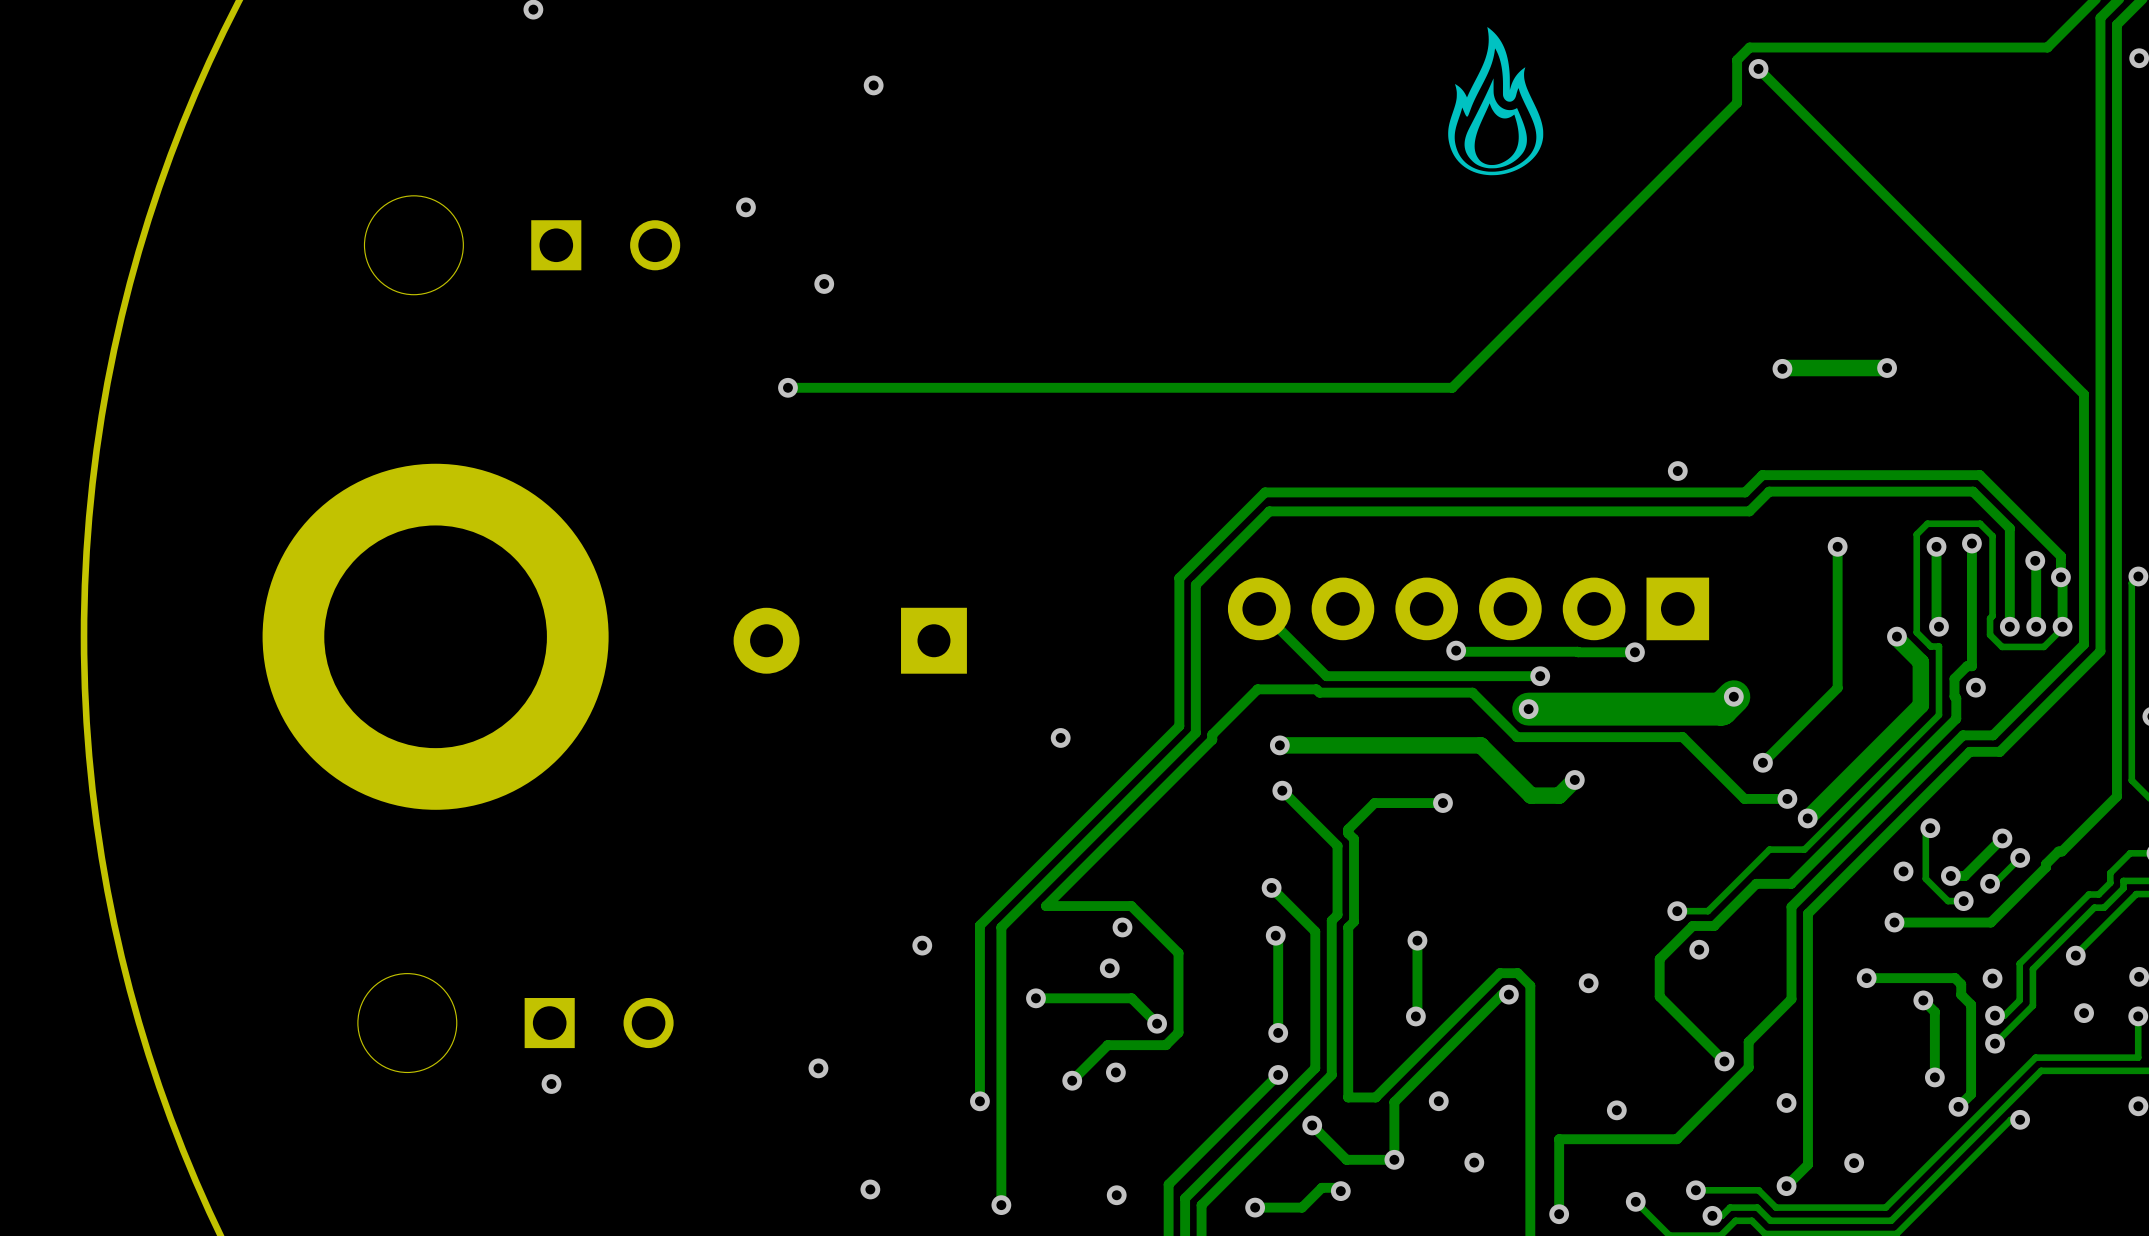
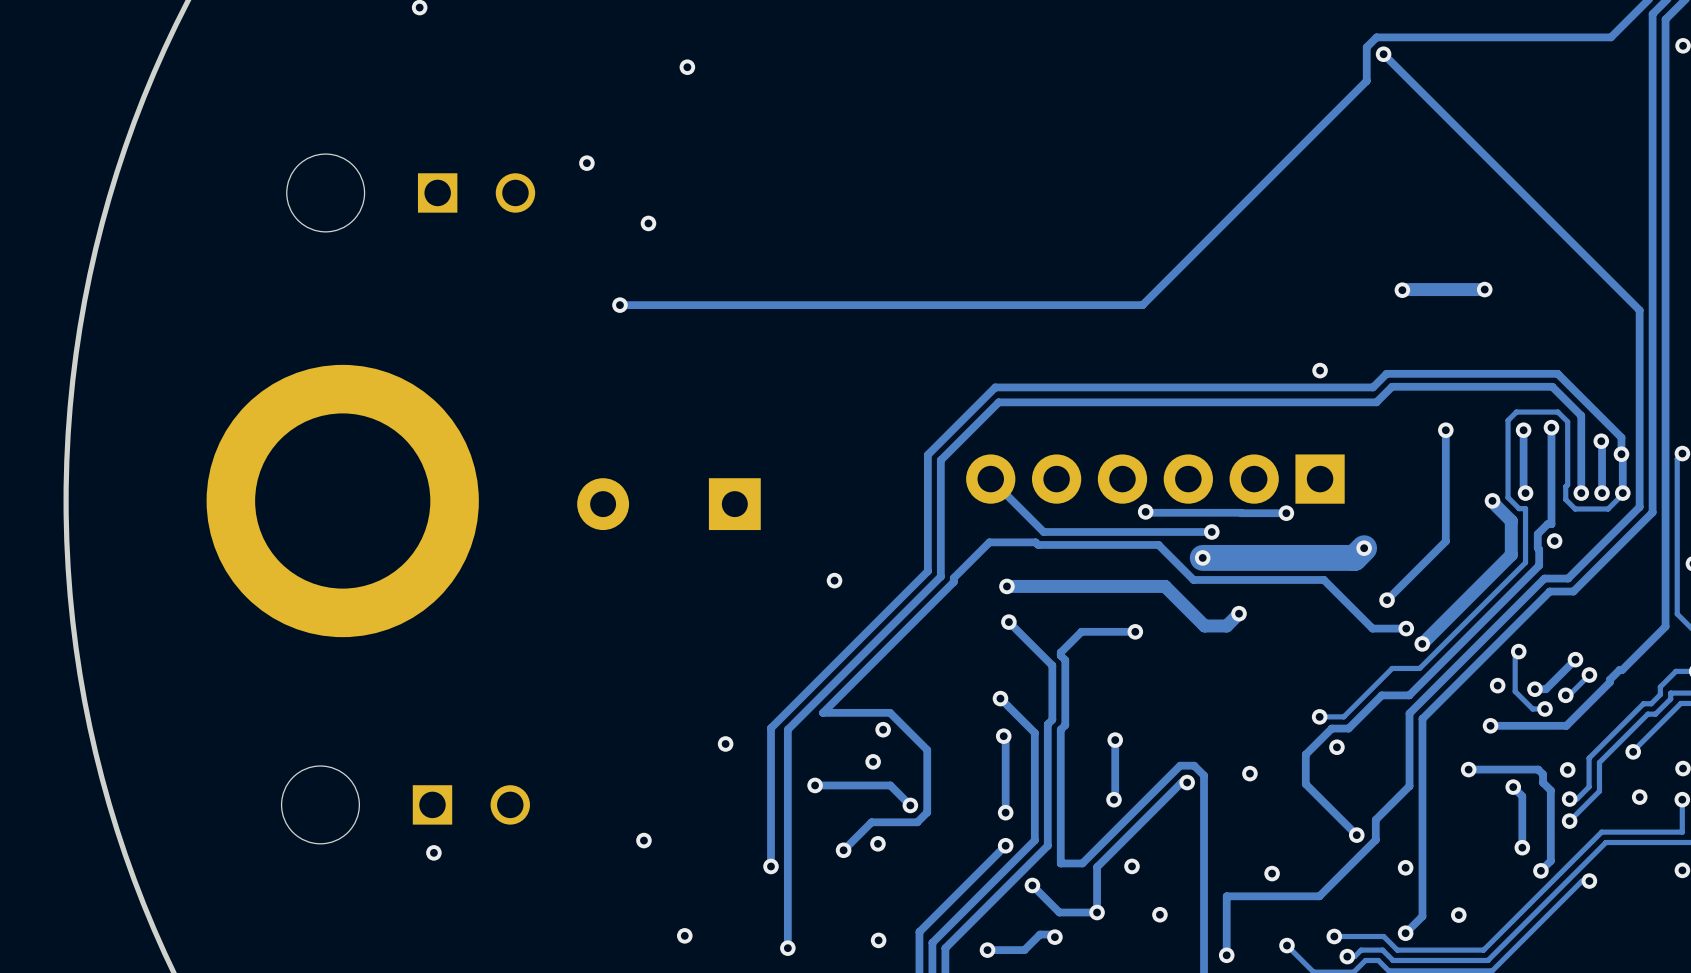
drawing: [1448, 27, 1544, 176] -> none

